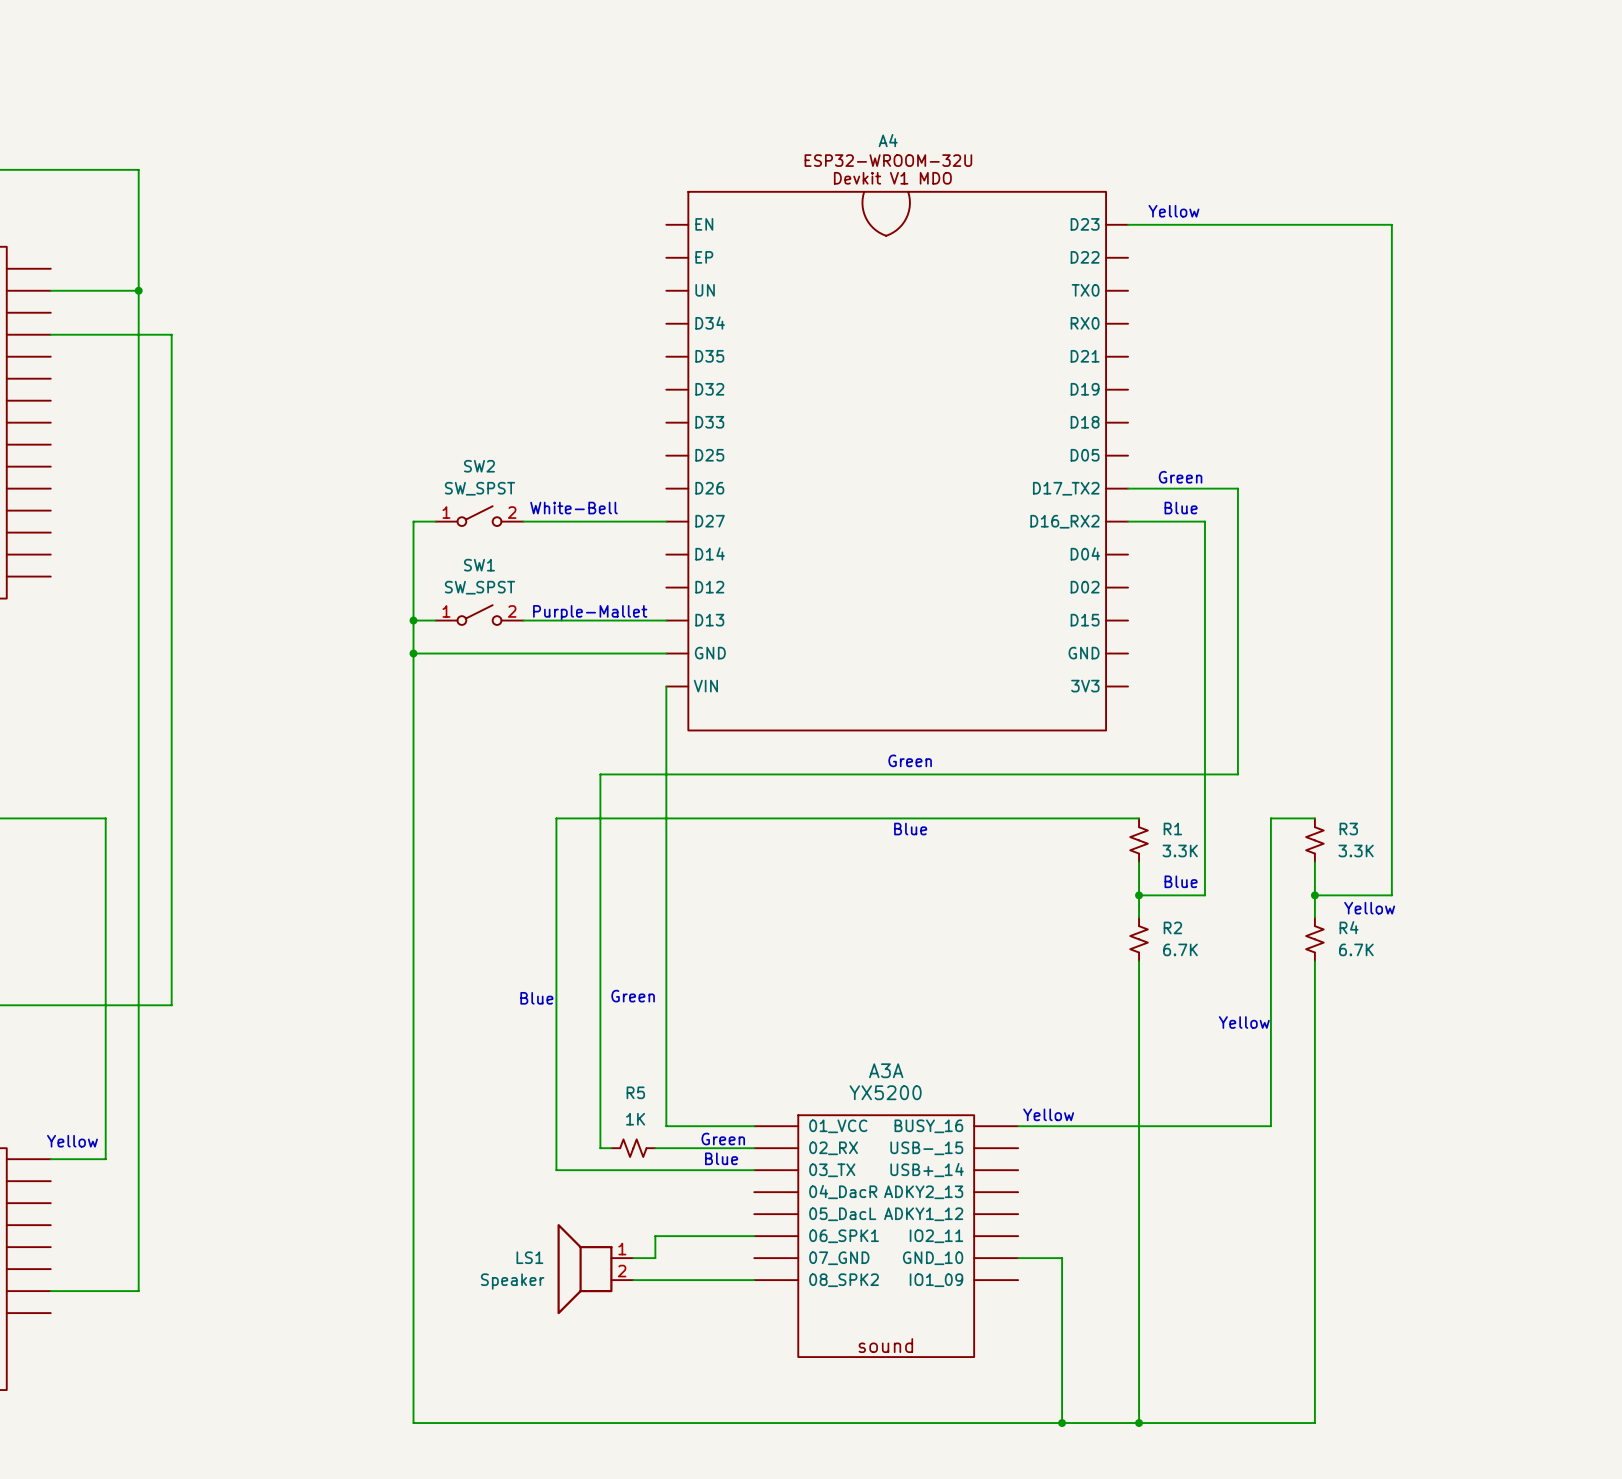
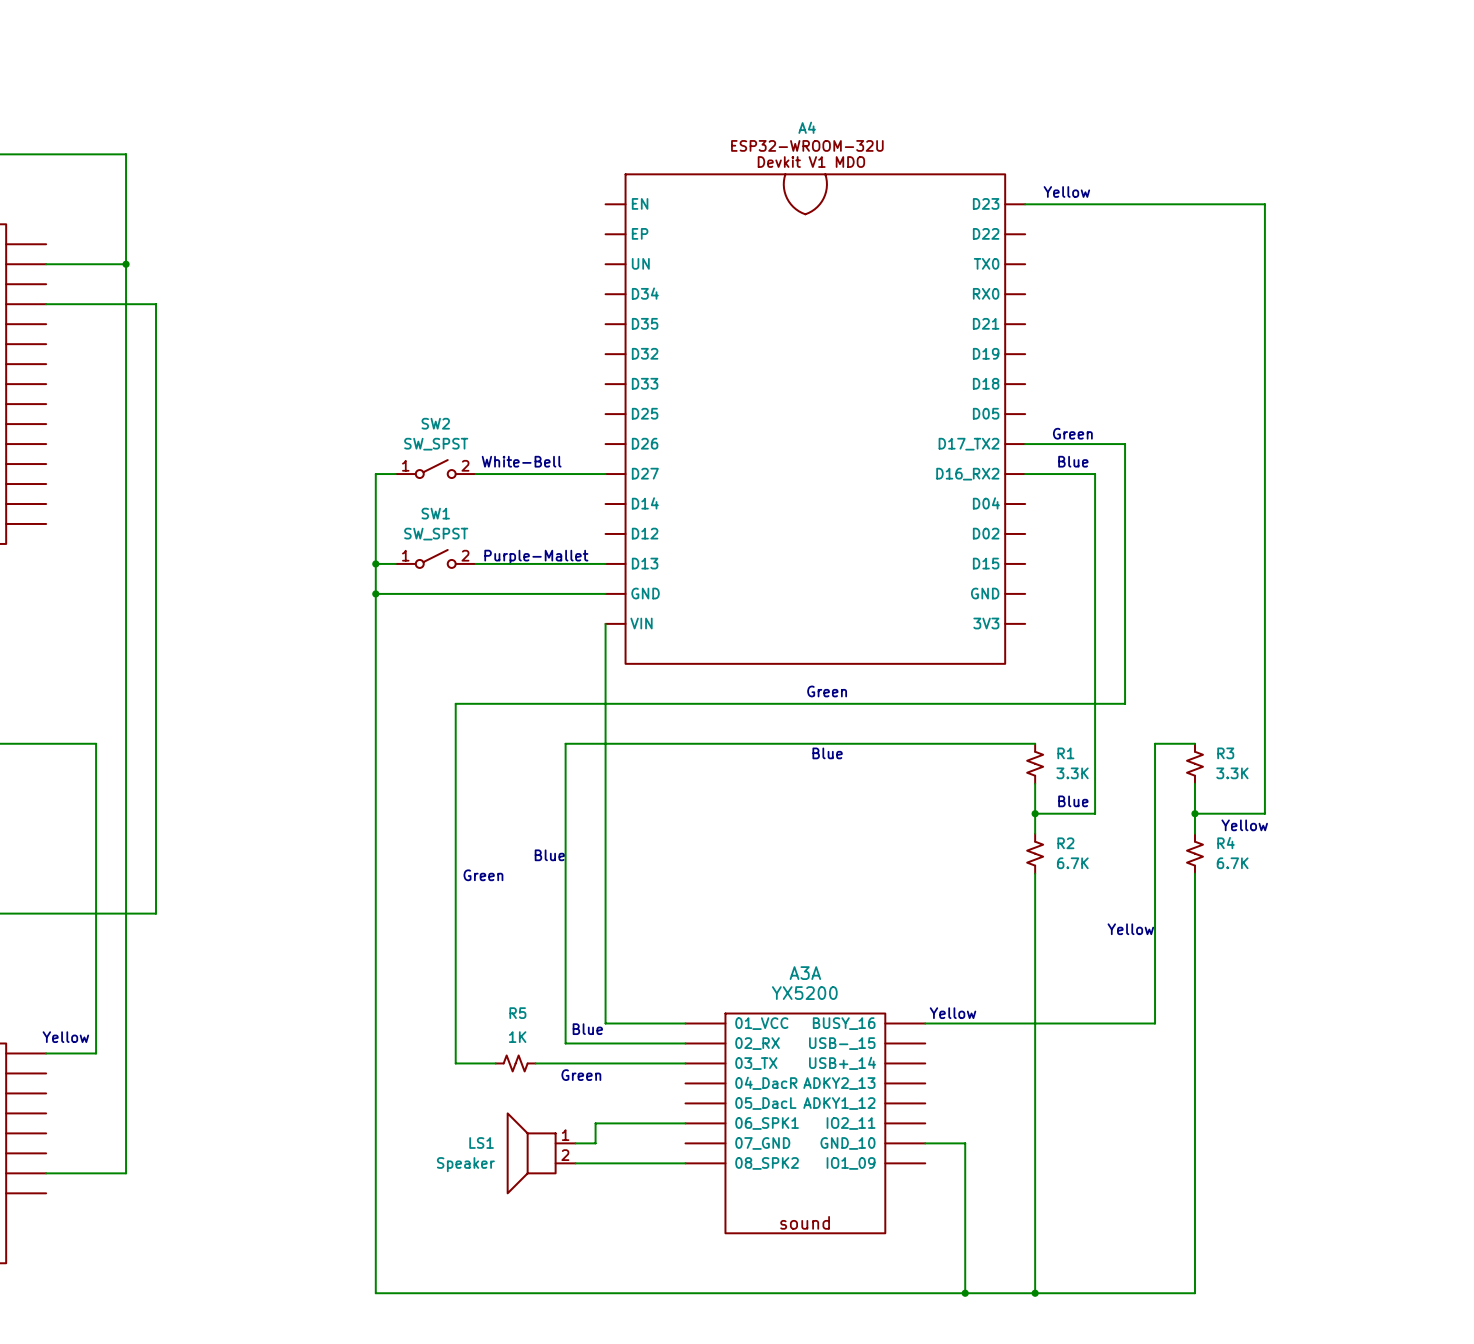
wire: (600, 774) (600, 1148) (611, 1148) -> (545, 703) (455, 703) (455, 1063) (495, 1063)
wire: (622, 818) (556, 818) (556, 1170) (589, 1170) -> (565, 743) (565, 1043) (595, 1043)
text: none -> Blue (549, 855)
text: none -> Green (483, 875)
text: Green (633, 996) -> none
text: Blue (536, 998) -> none
text: Green (723, 1139) -> none
R5 position: (633, 1148) -> (515, 1063)
text position: Blue (721, 1158) -> Blue (587, 1029)
text: none -> Green (581, 1075)

